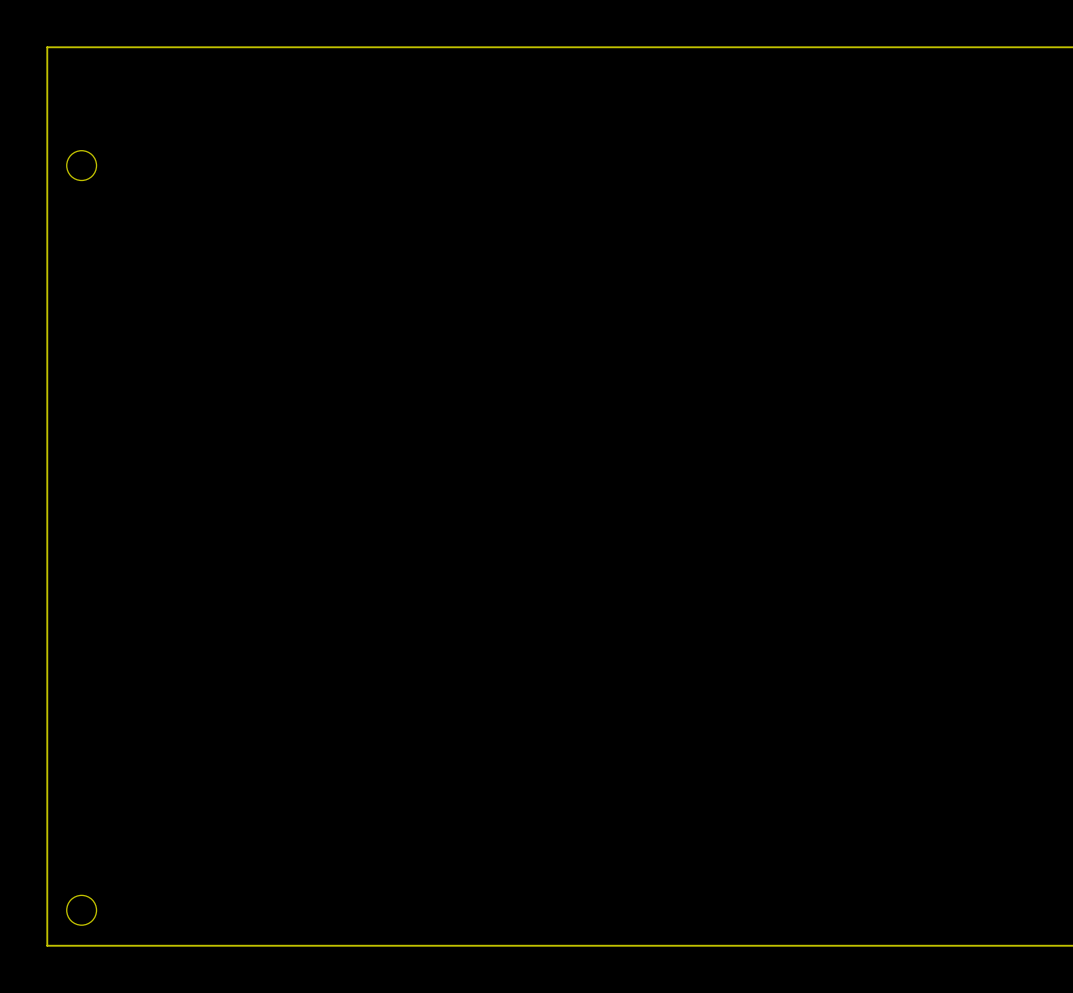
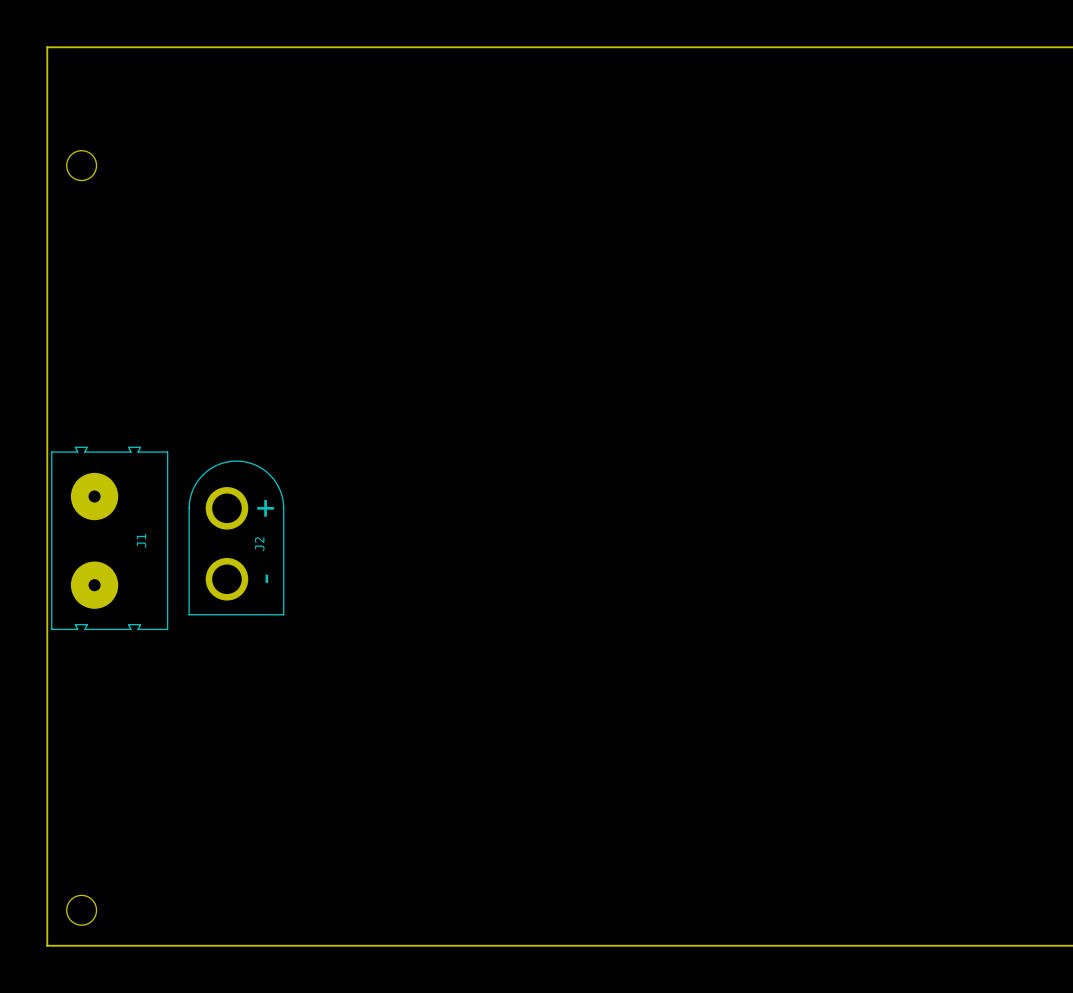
J2: none -> (236, 537)
J1: none -> (109, 538)

